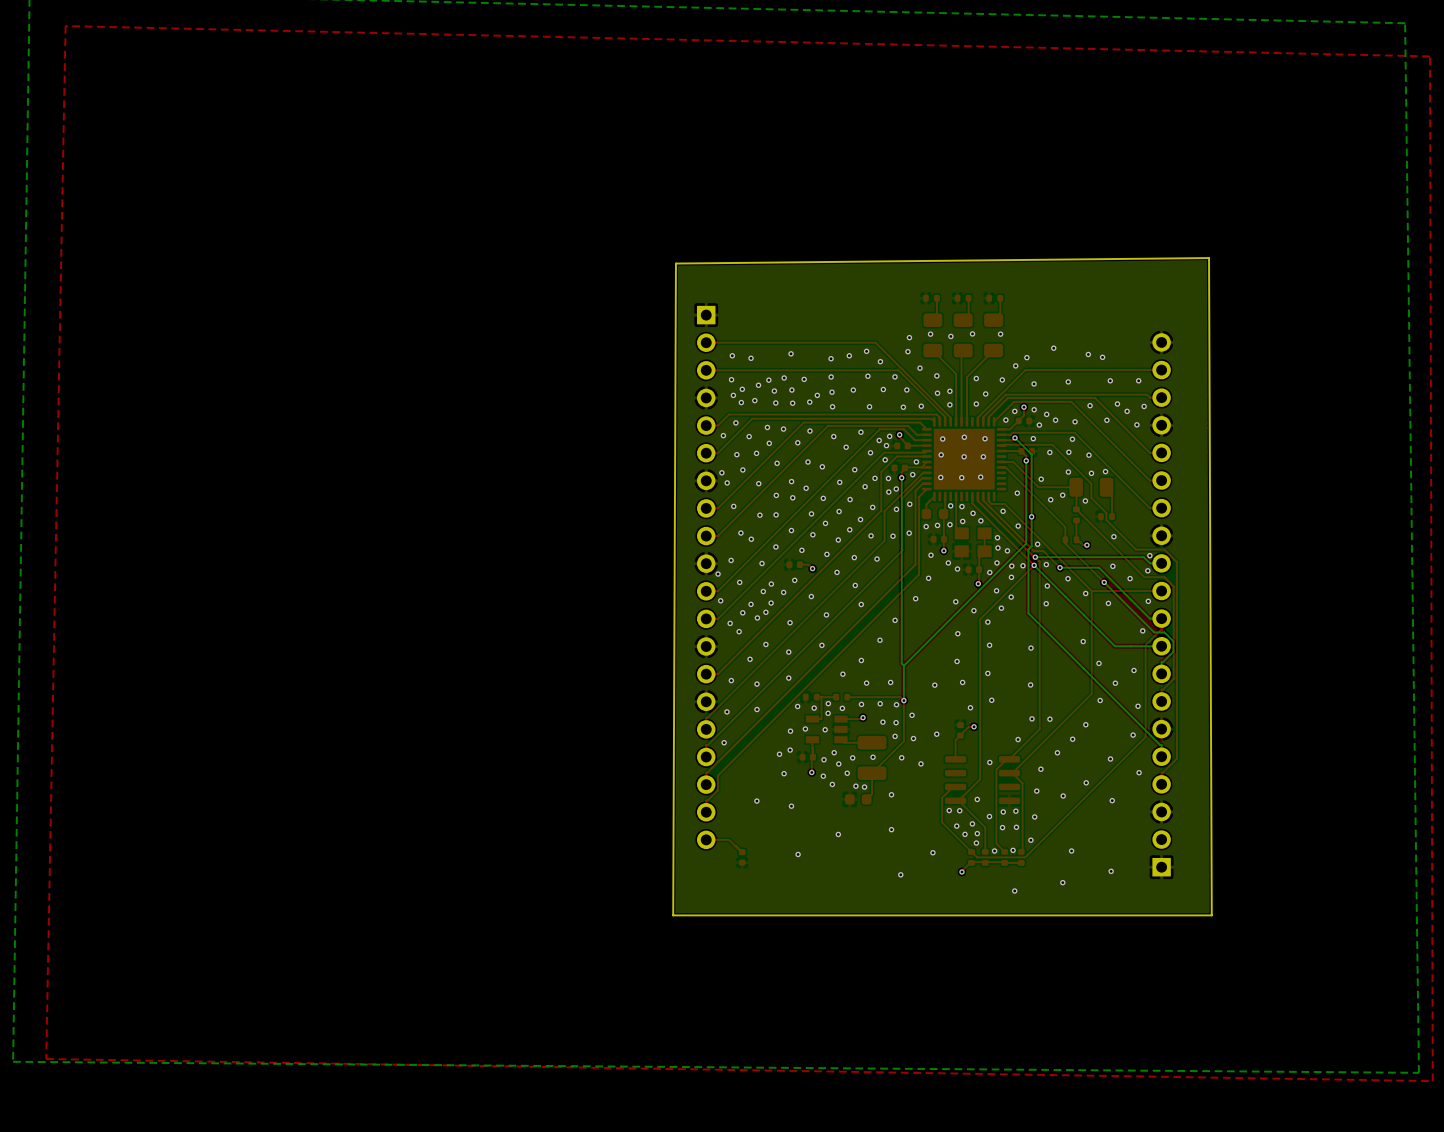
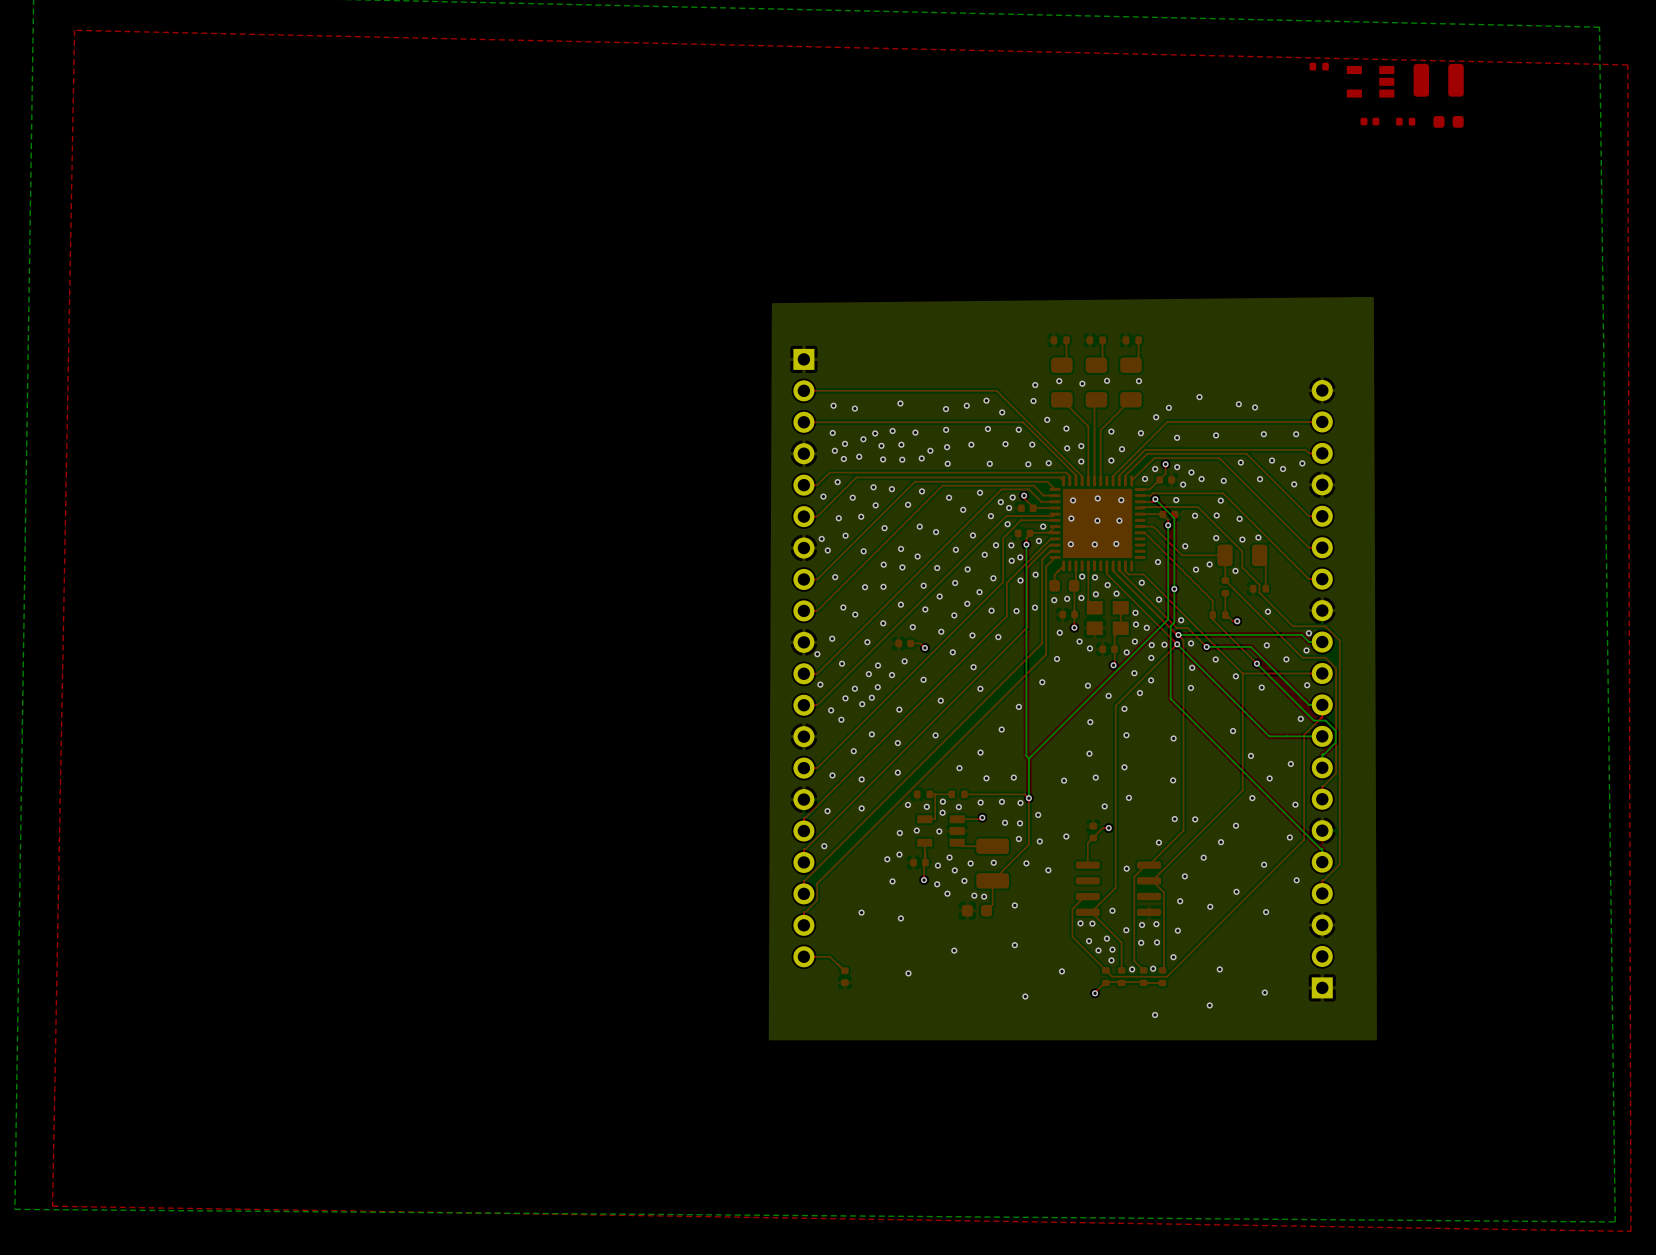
part: none -> (1319, 66)
part: none -> (1438, 80)
part: none -> (1370, 81)
part: none -> (1369, 121)
part: none -> (1405, 121)
part: none -> (1448, 121)
board edge: (1209, 258) (675, 263) (673, 915) (1211, 915) (1209, 258) -> none

